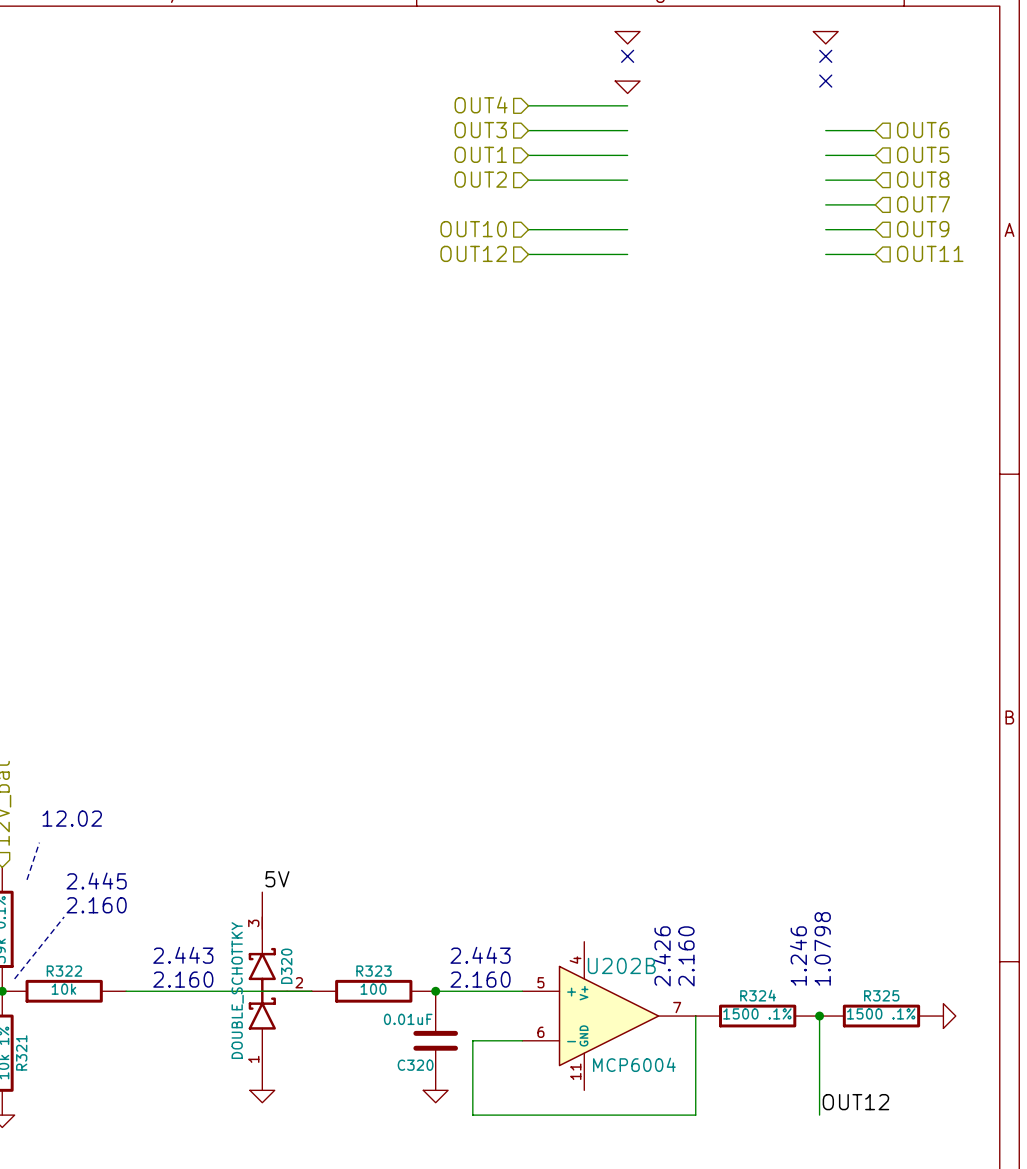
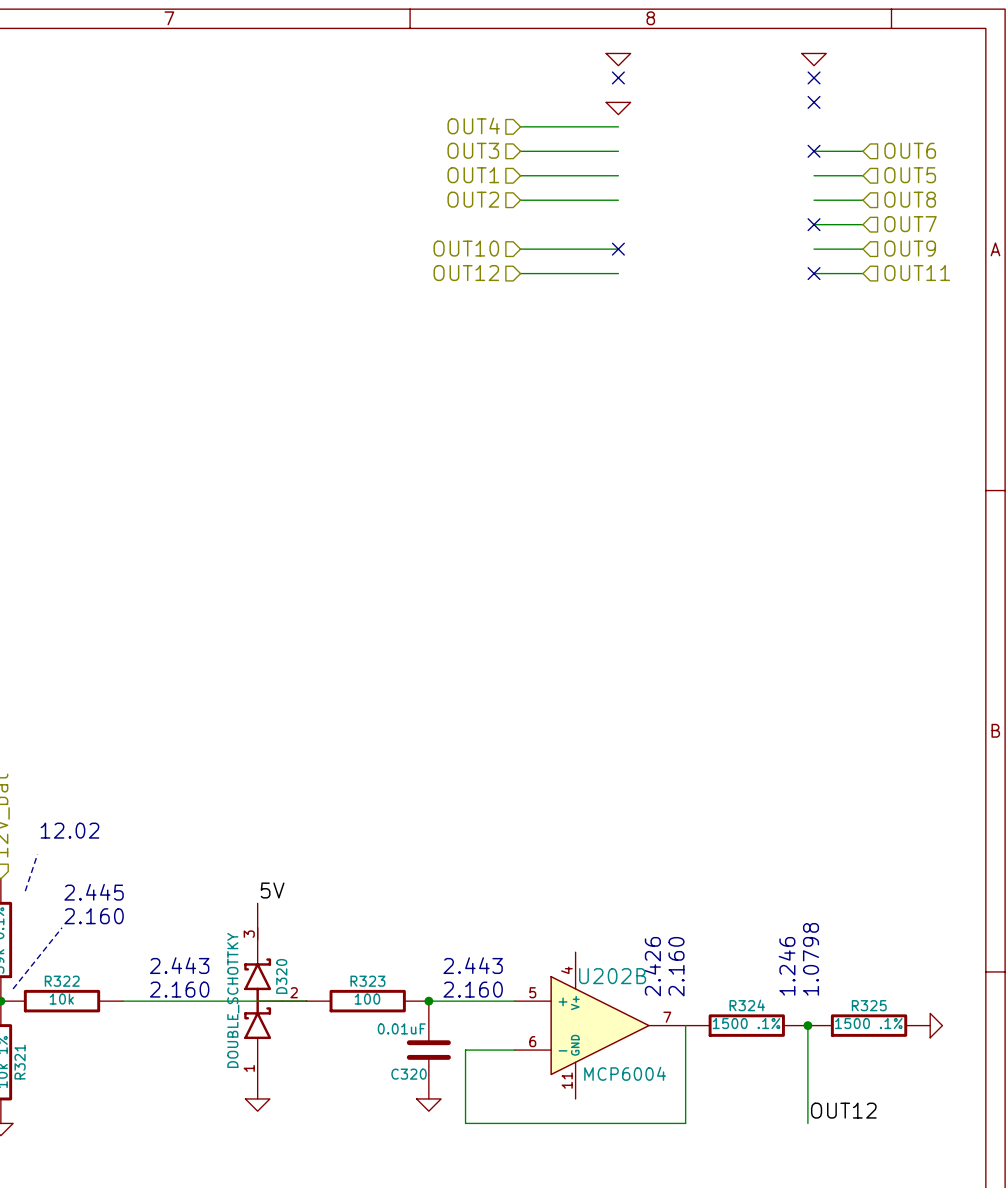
no-connect mark: none -> (814, 151)
no-connect mark: none -> (814, 224)
no-connect mark: none -> (618, 249)
no-connect mark: none -> (814, 273)

